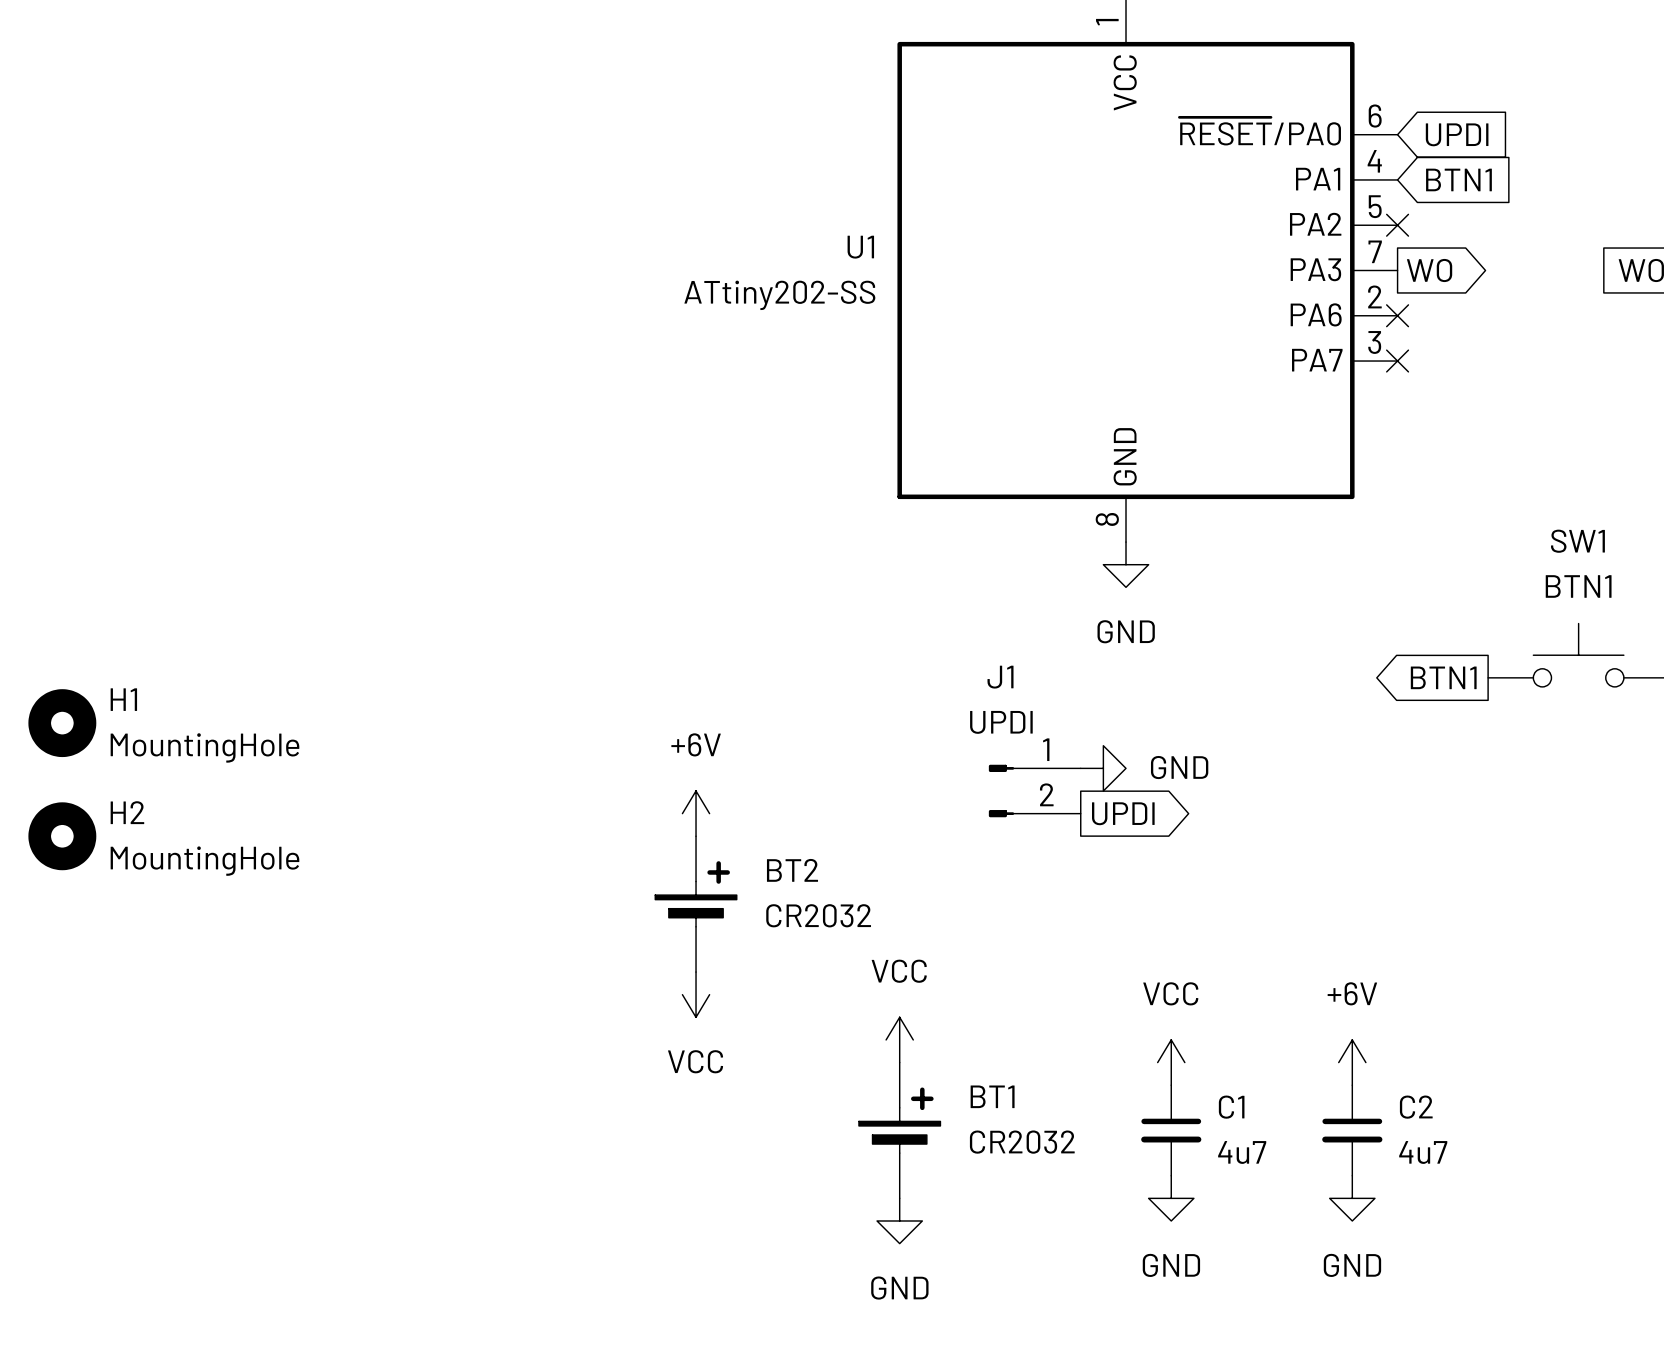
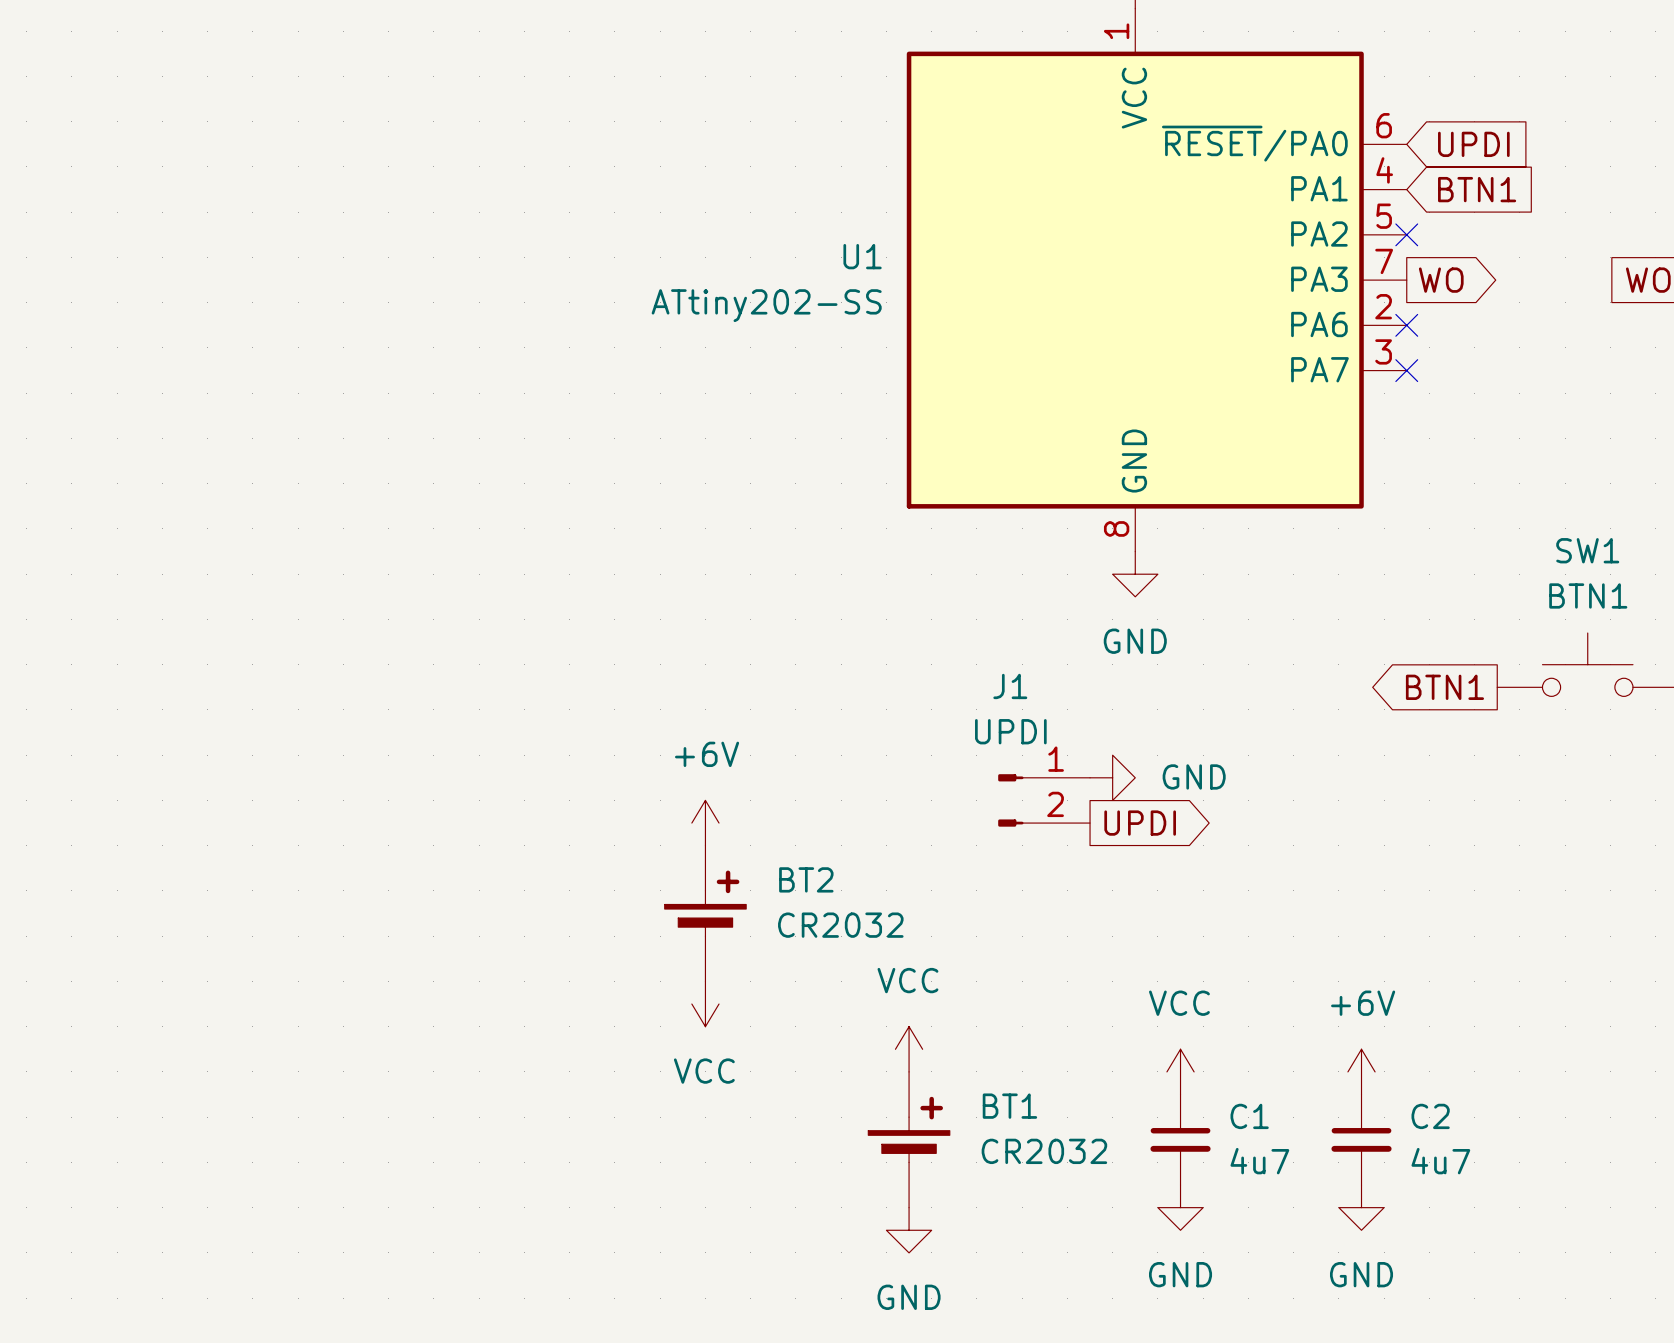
H1: MountingHole (62, 723) -> none
H2: MountingHole (62, 836) -> none

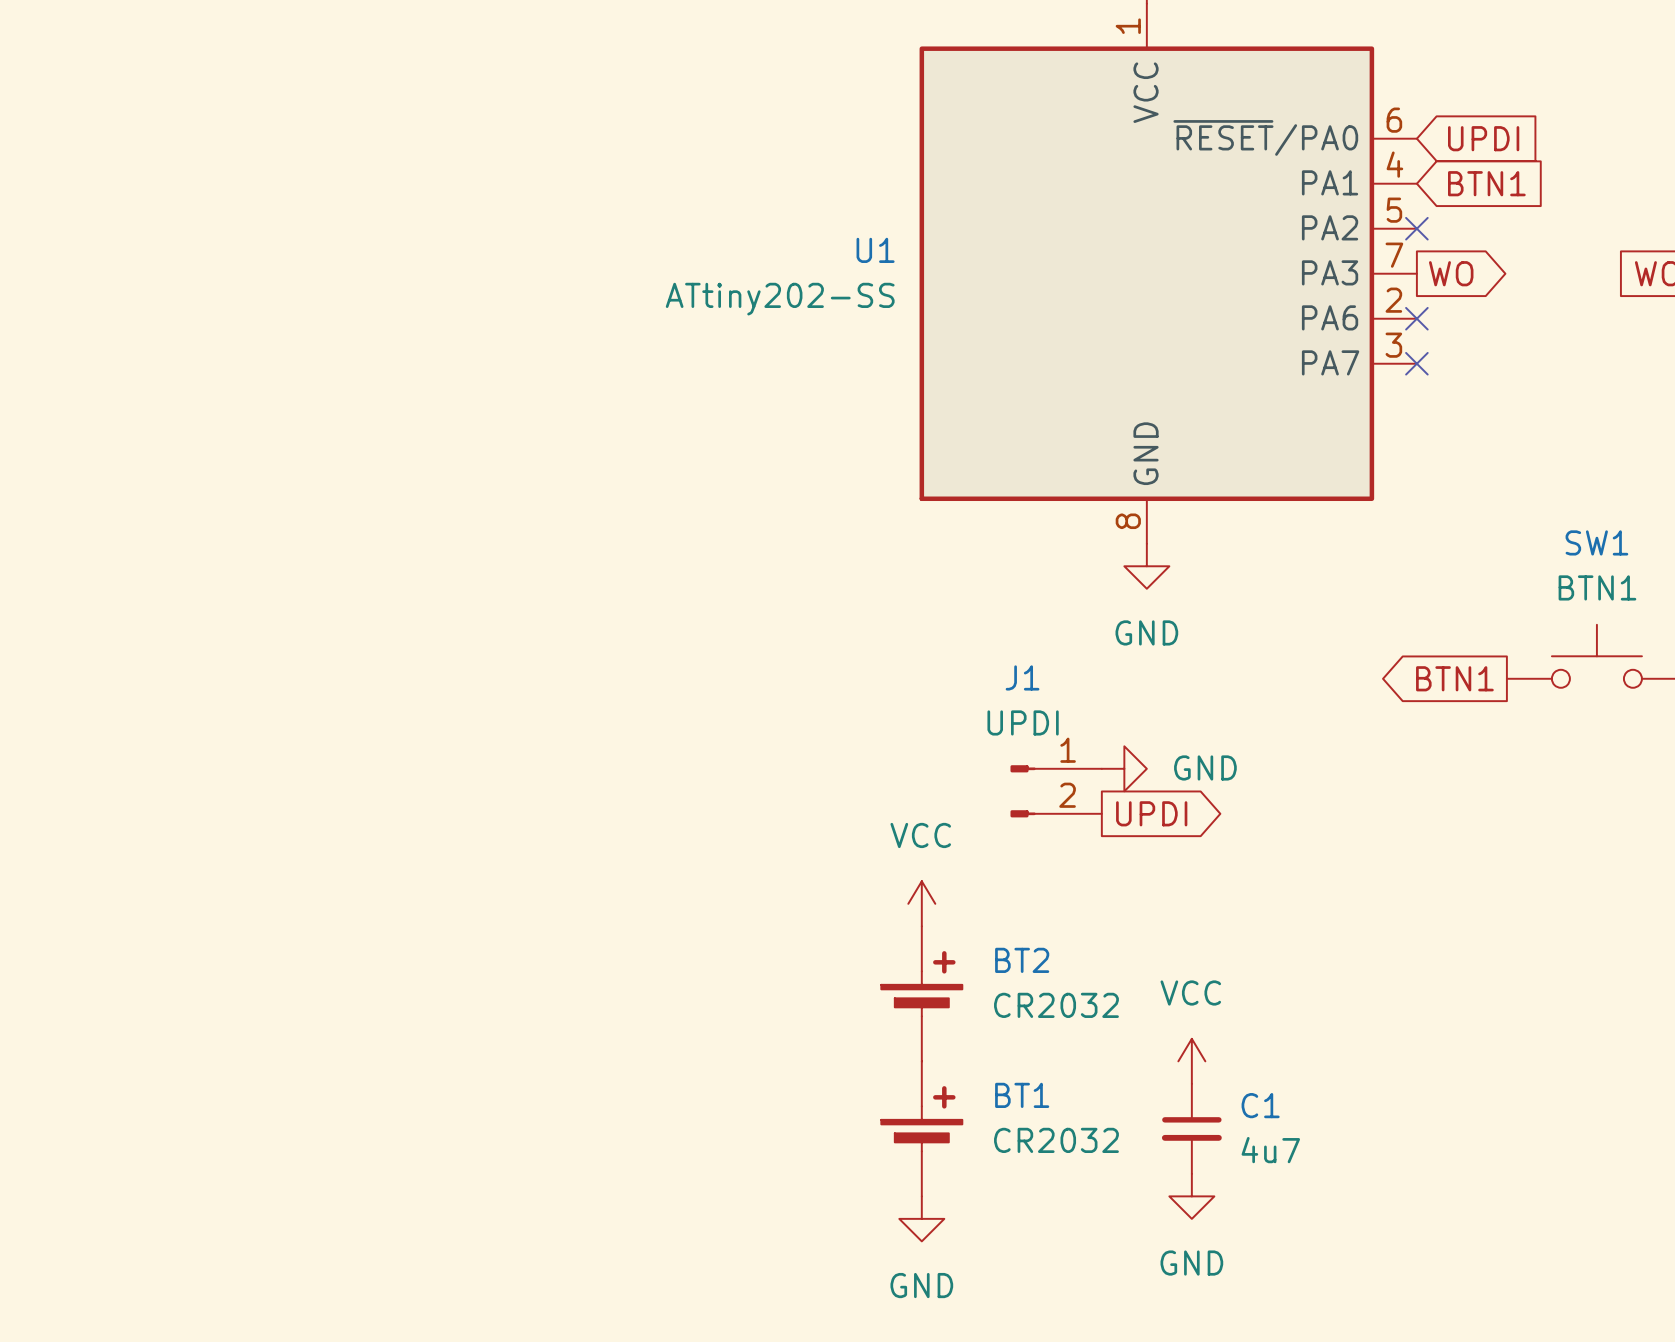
power symbol: +6V (705, 823) -> none
BT2 position: (705, 913) -> (921, 993)
power symbol: none -> VCC (921, 903)
power symbol: VCC (705, 1004) -> none
power symbol: VCC (909, 1049) -> none
power symbol: +6V (1361, 1071) -> none
C2: 4u7 (1361, 1139) -> none
power symbol: GND (1361, 1207) -> none

